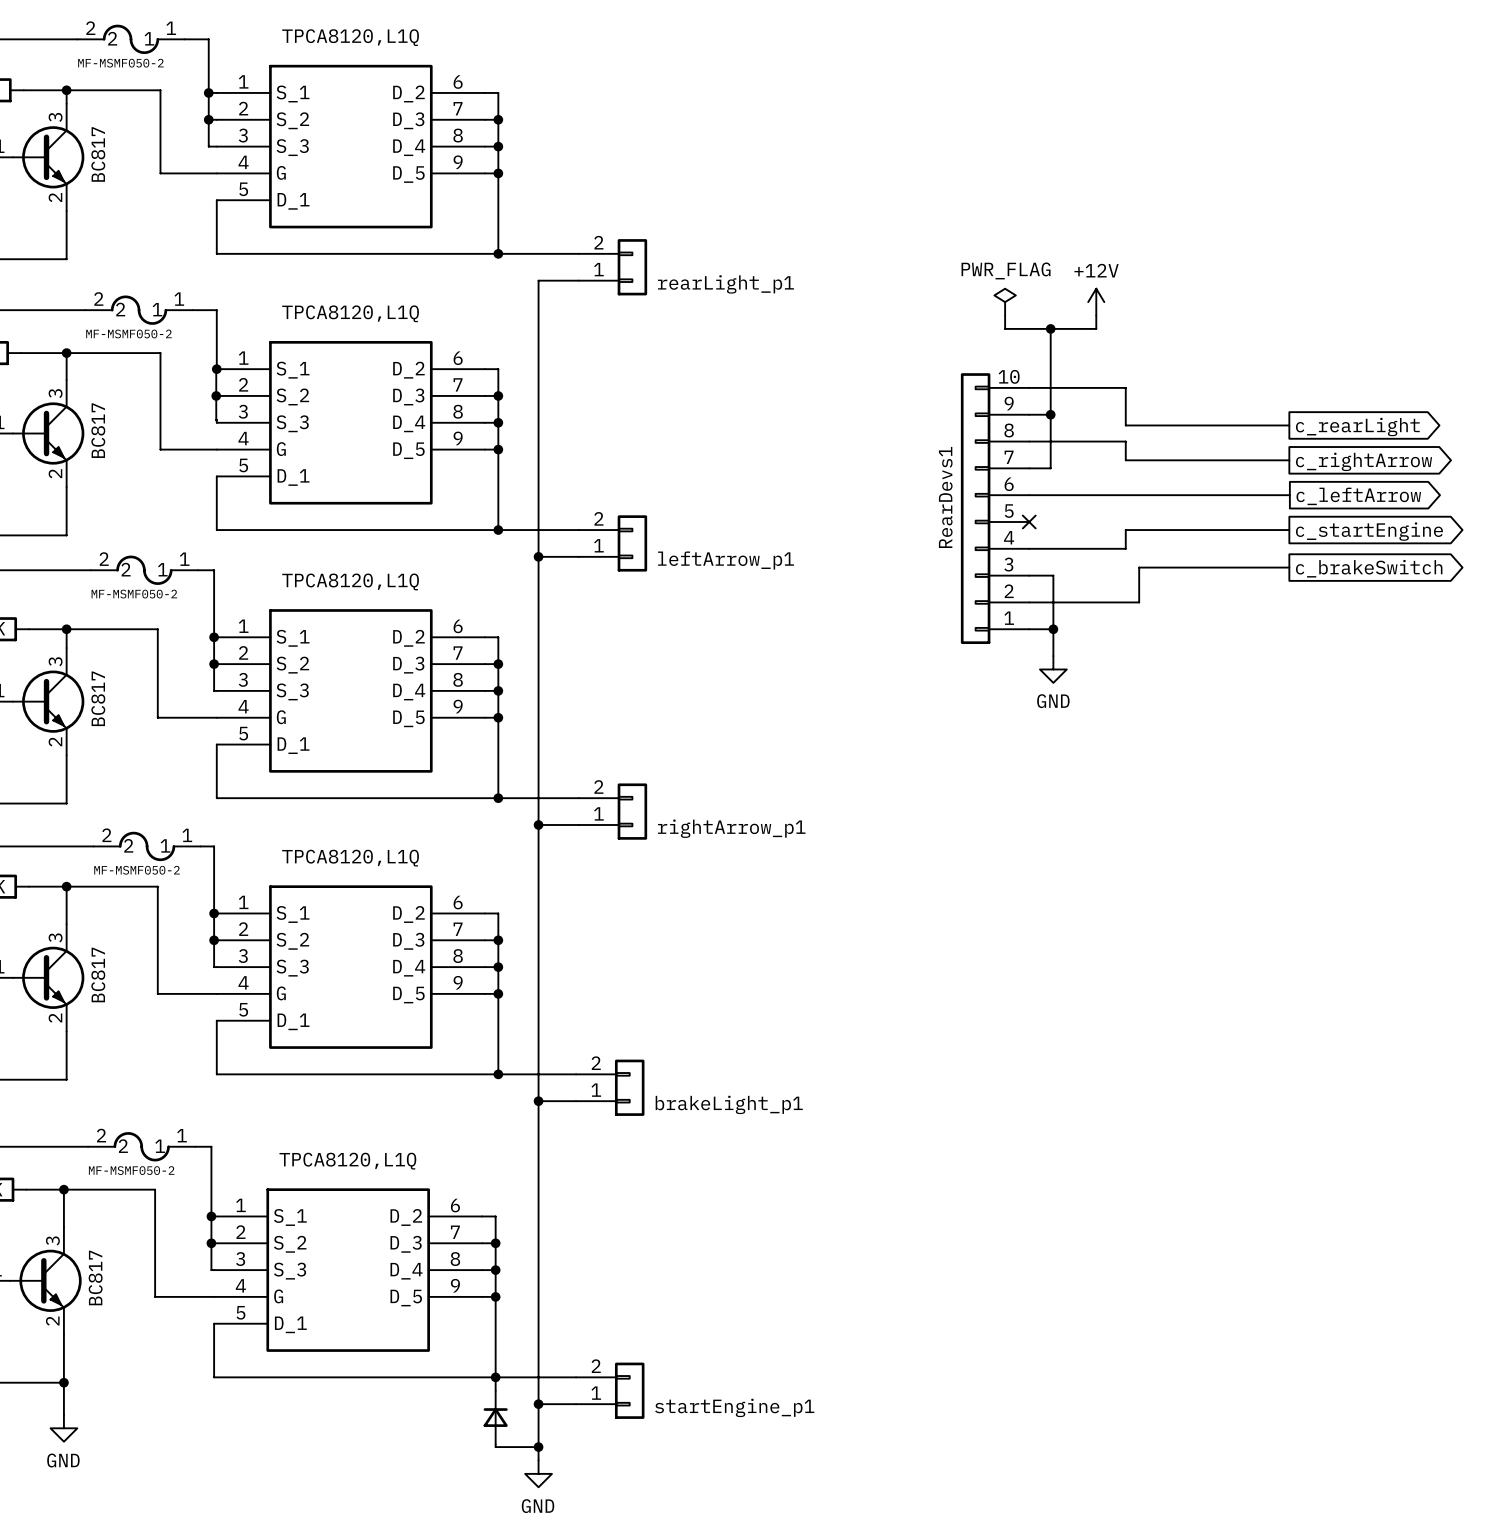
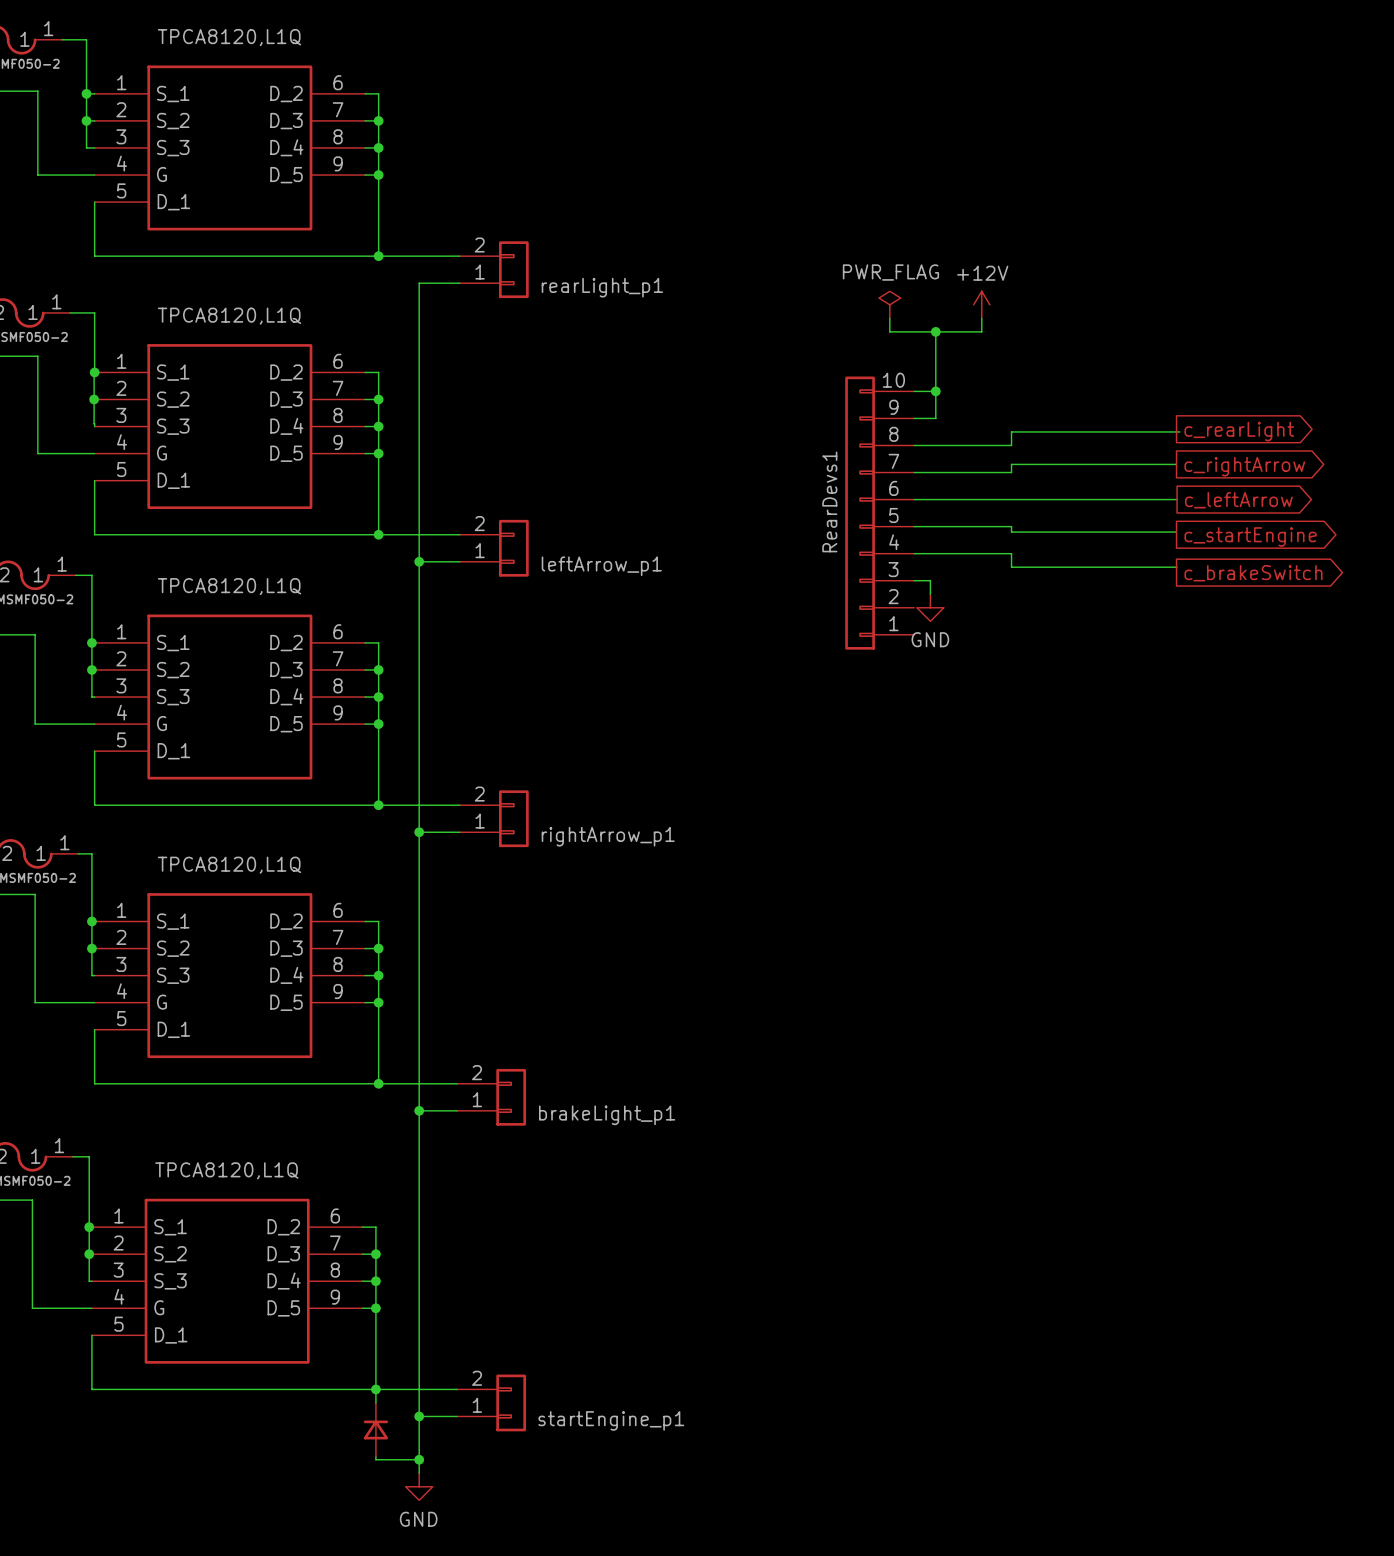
wire: (1050, 387) (1125, 387) (1125, 425) (1289, 425) -> none
wire: (1050, 414) (1050, 468) -> none
junction position: (1050, 414) -> (935, 391)
wire: none -> (1179, 431) (1011, 431) (1011, 445)
wire: (1125, 441) (1125, 460) -> (935, 472) (1011, 472) (1011, 464)
wire: none -> (914, 526) (1011, 526) (1011, 532) (1176, 532)
no-connect mark: (1029, 521) -> none
wire: (1289, 530) (1125, 530) (1125, 548) -> (1177, 567) (1011, 567) (1011, 553)
wire: (1289, 567) (1139, 567) (1139, 602) (1029, 602) -> none
wire: (1045, 575) (1053, 575) (1053, 656) -> (930, 580) (930, 594)
wire: (1029, 629) (1053, 629) -> none
junction: (1053, 629) -> none
power symbol position: GND (1053, 669) -> GND (930, 607)

